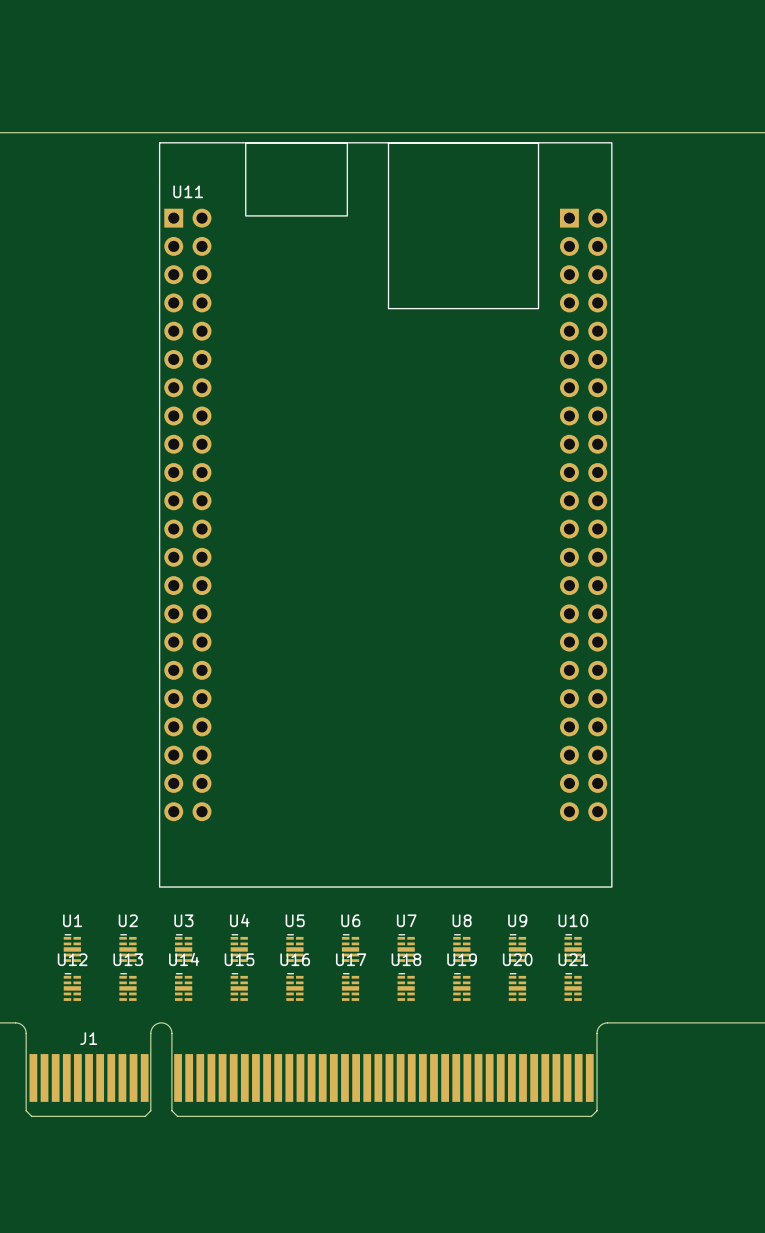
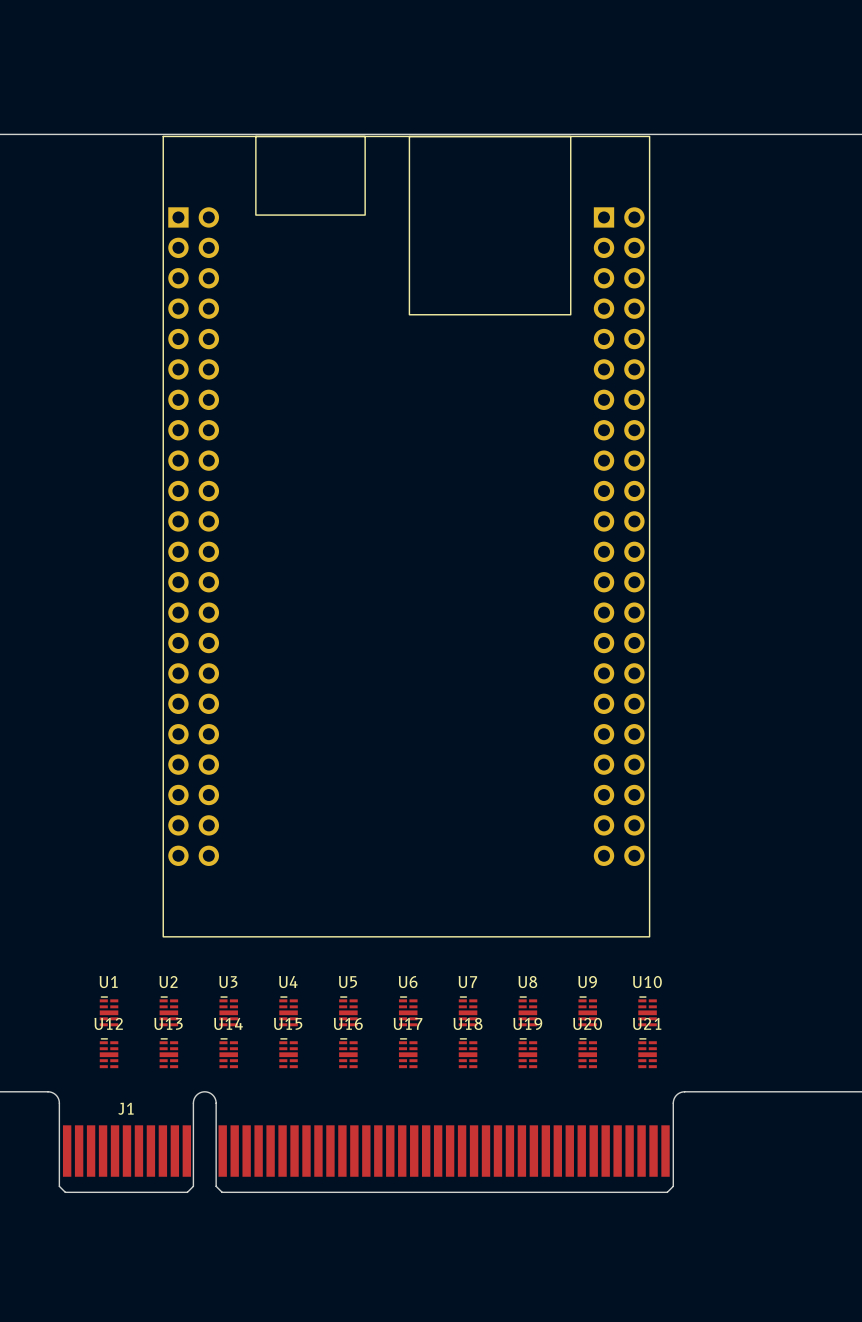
part: none -> (406, 536)
U11: (385, 514) -> none

